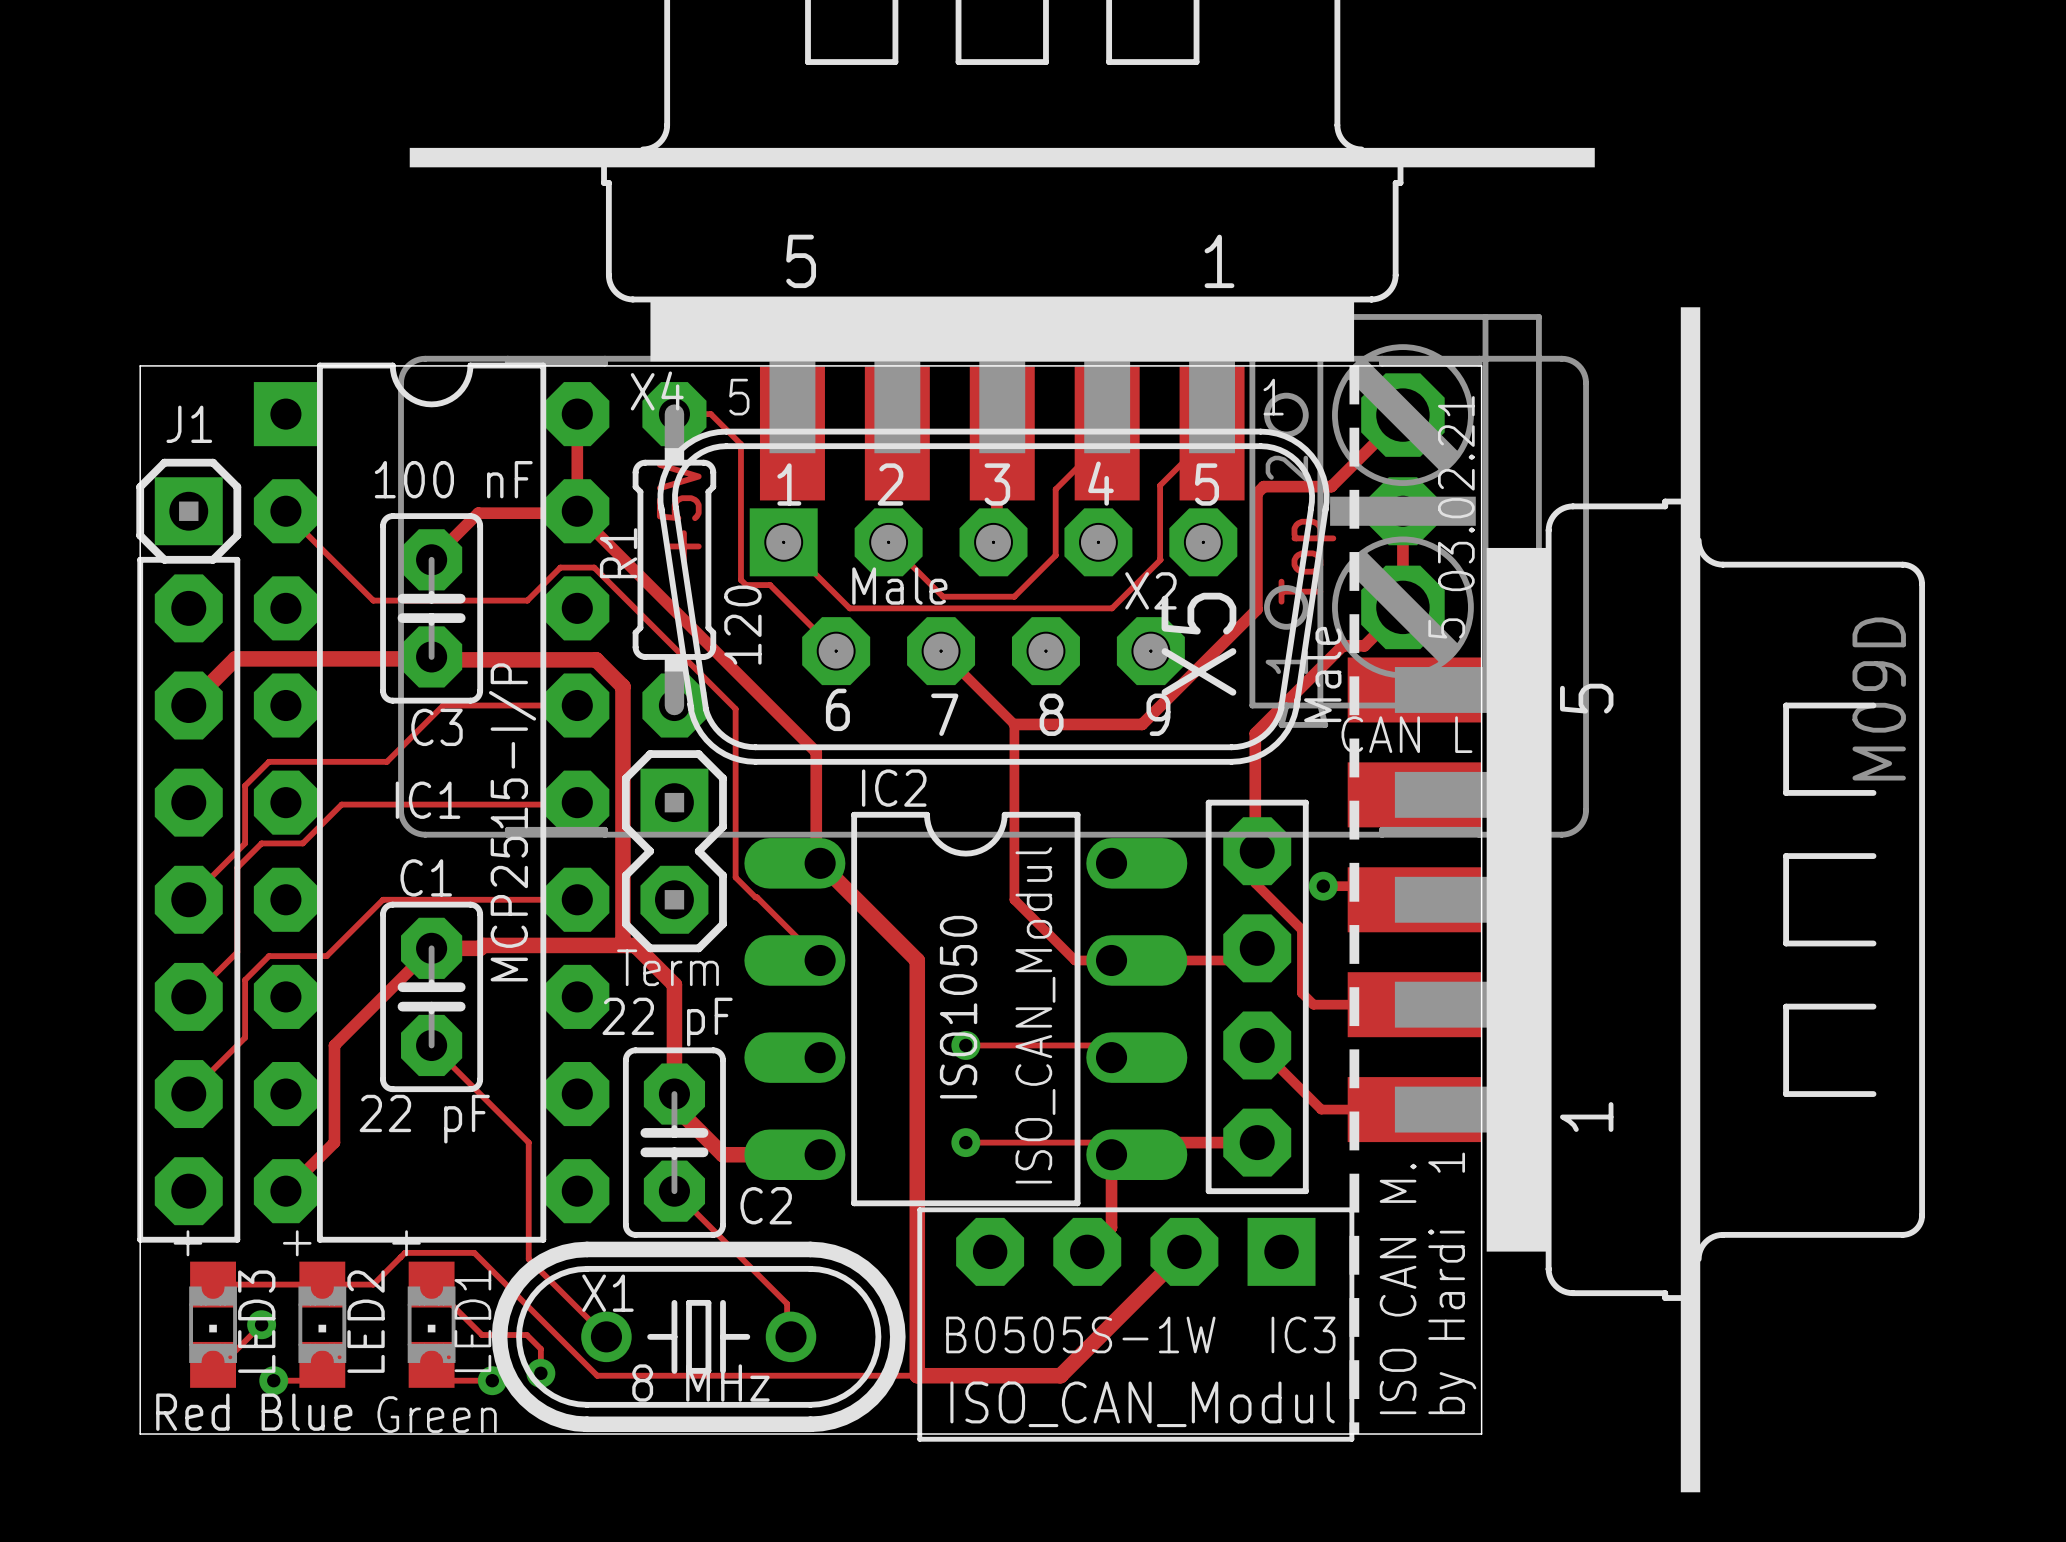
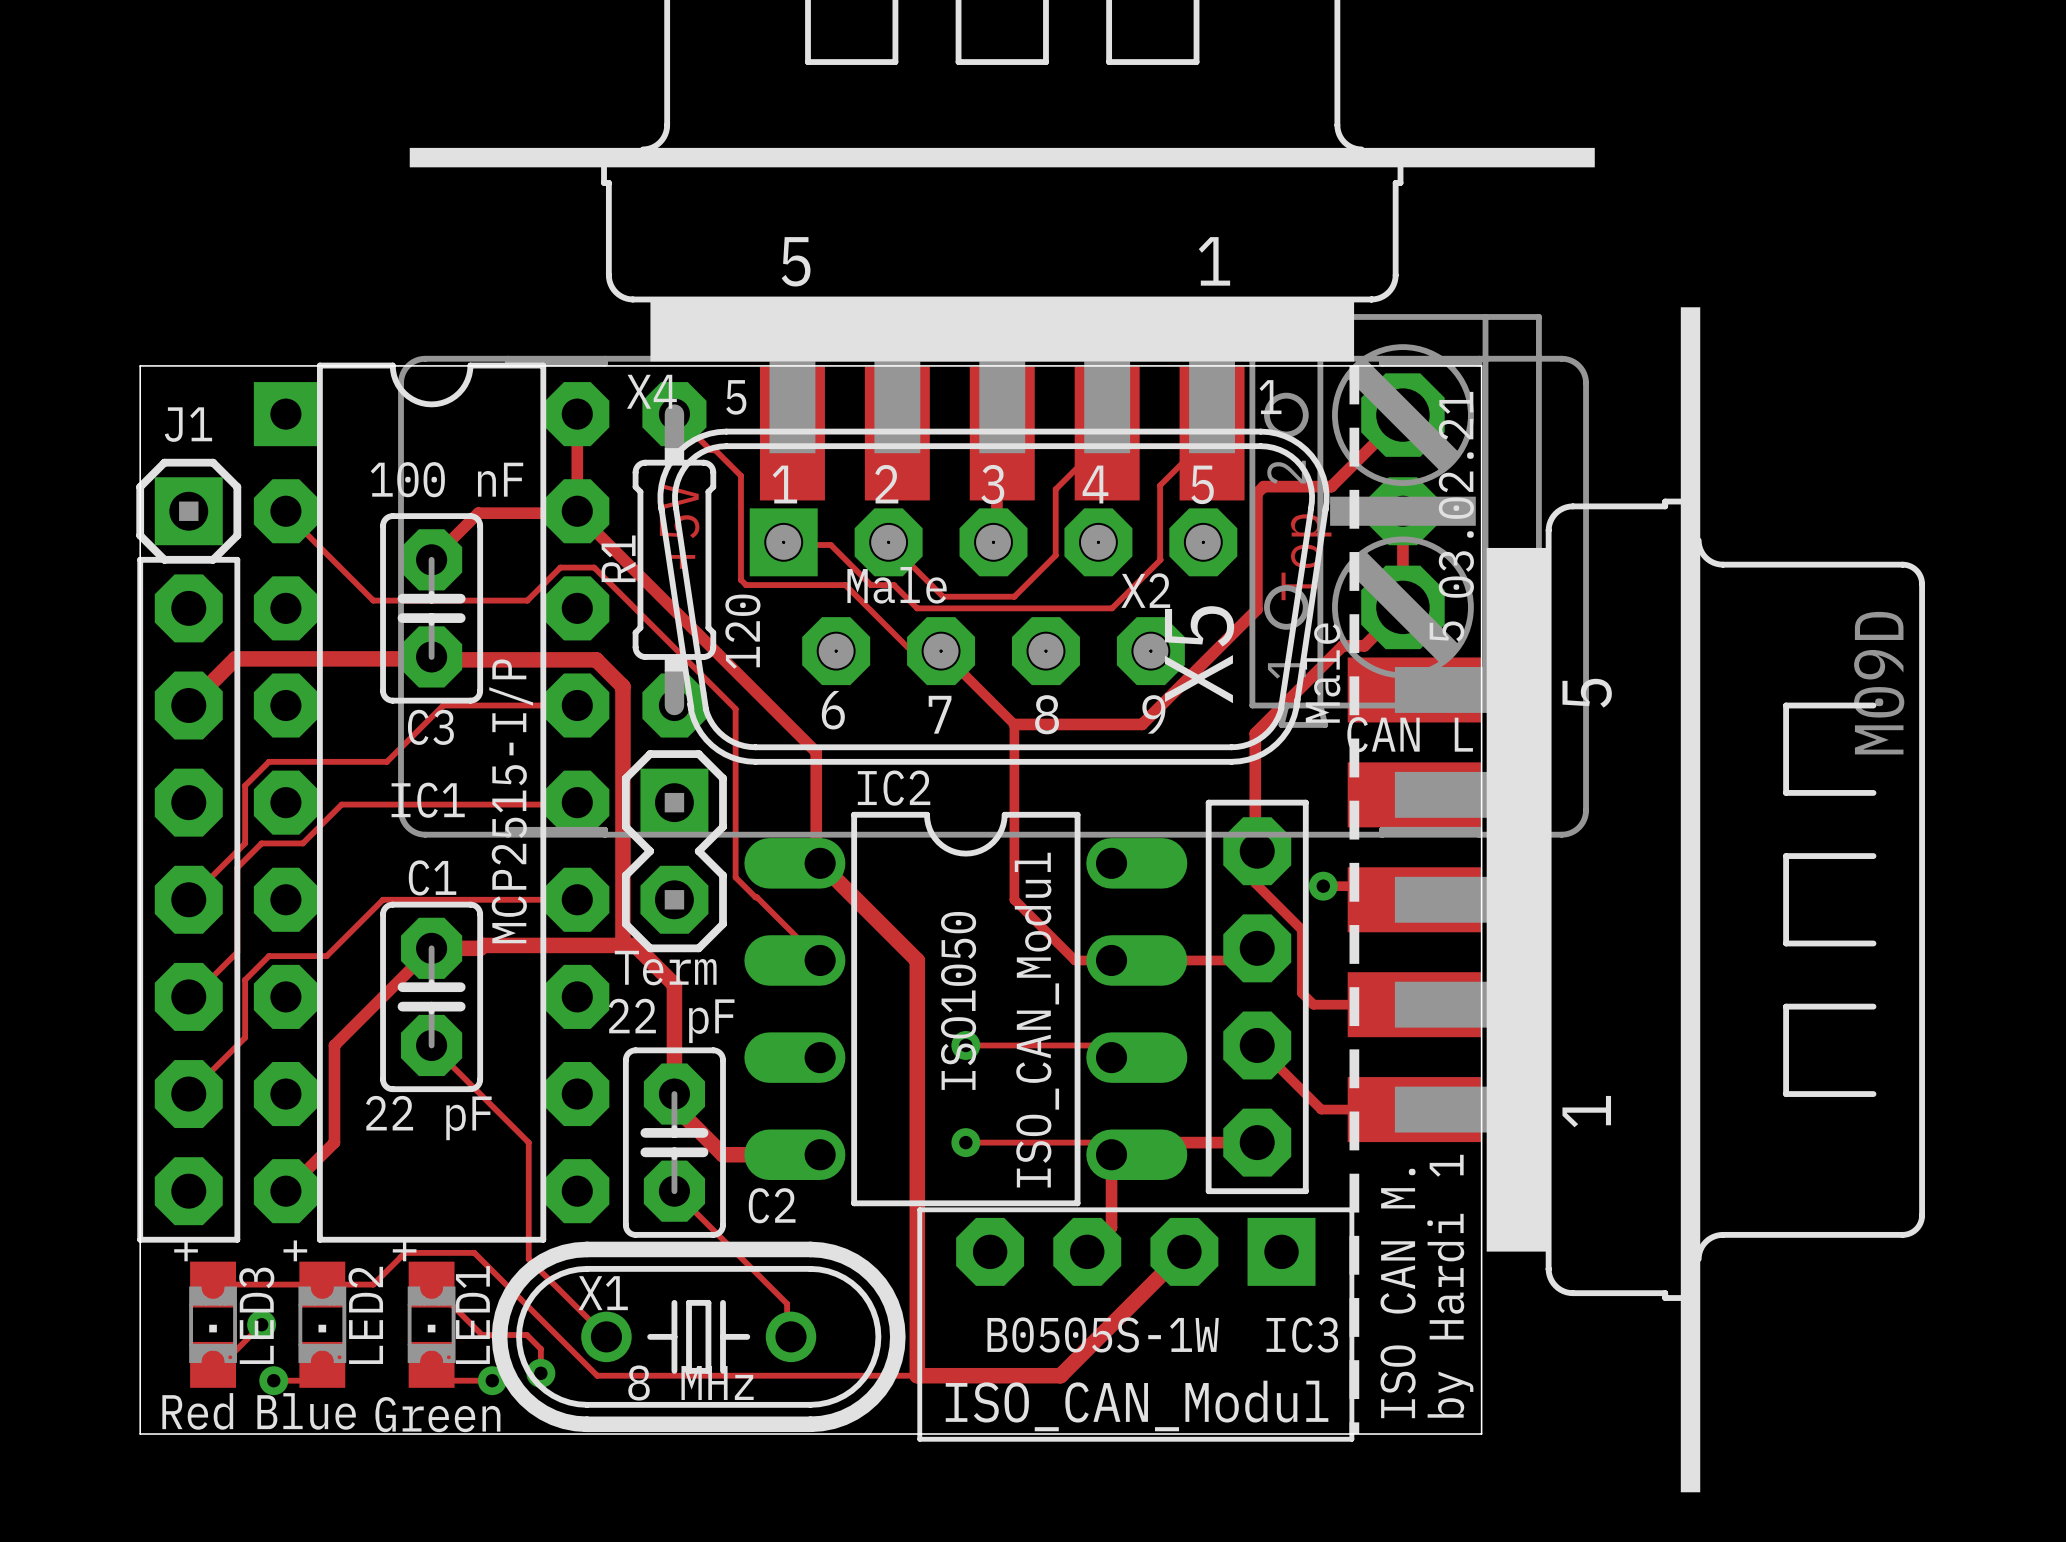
track: (674, 414) (710, 414) (740, 444) (740, 475) -> (674, 414) (710, 450) (715, 450) (740, 475)
track: (786, 544) (849, 608) (917, 608) -> (786, 544) (830, 544) (870, 585) (893, 585) (917, 608)
track: (770, 585) (836, 651) -> (770, 585) (845, 585) (911, 651) (941, 651)

